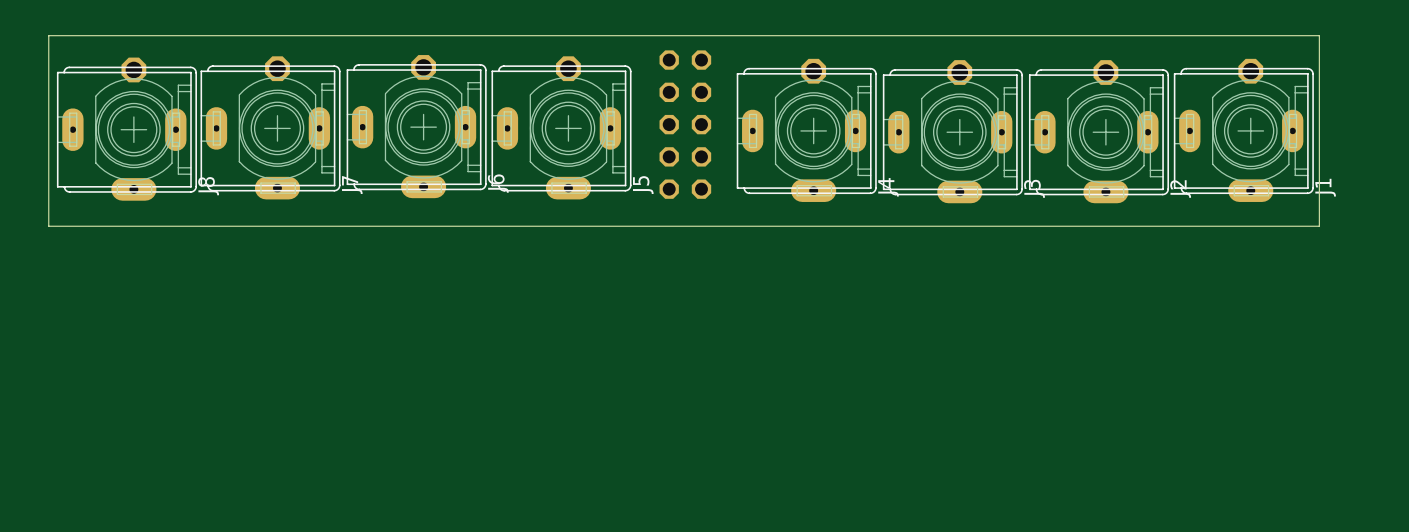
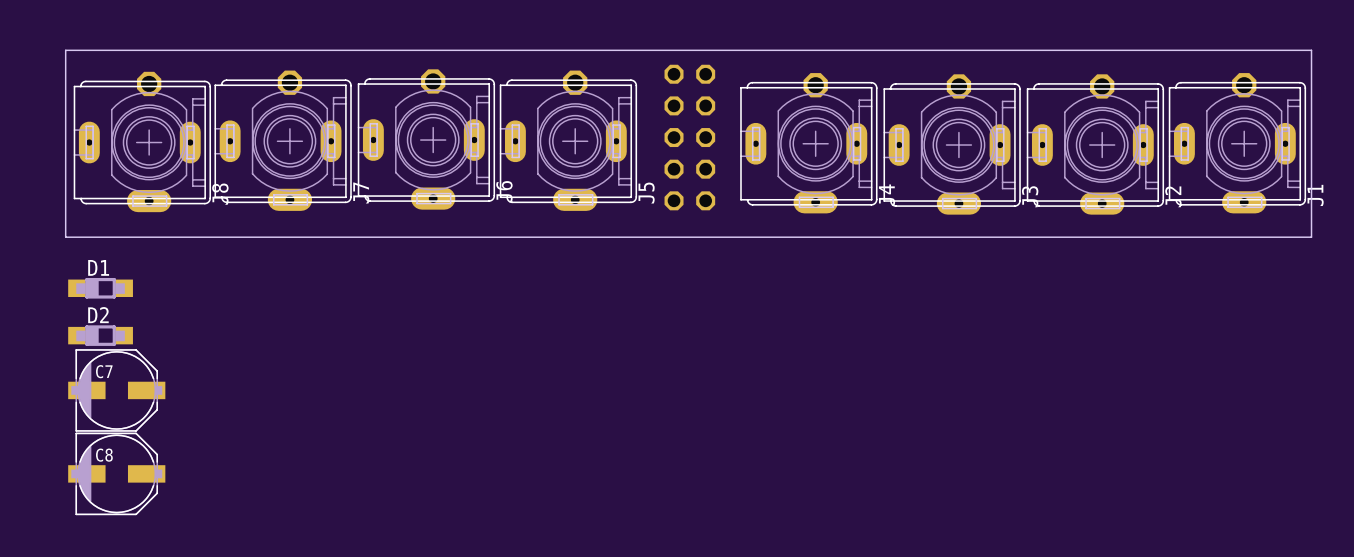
D1: none -> (100, 288)
D2: none -> (100, 335)
C7: none -> (116, 390)
C8: none -> (116, 473)

